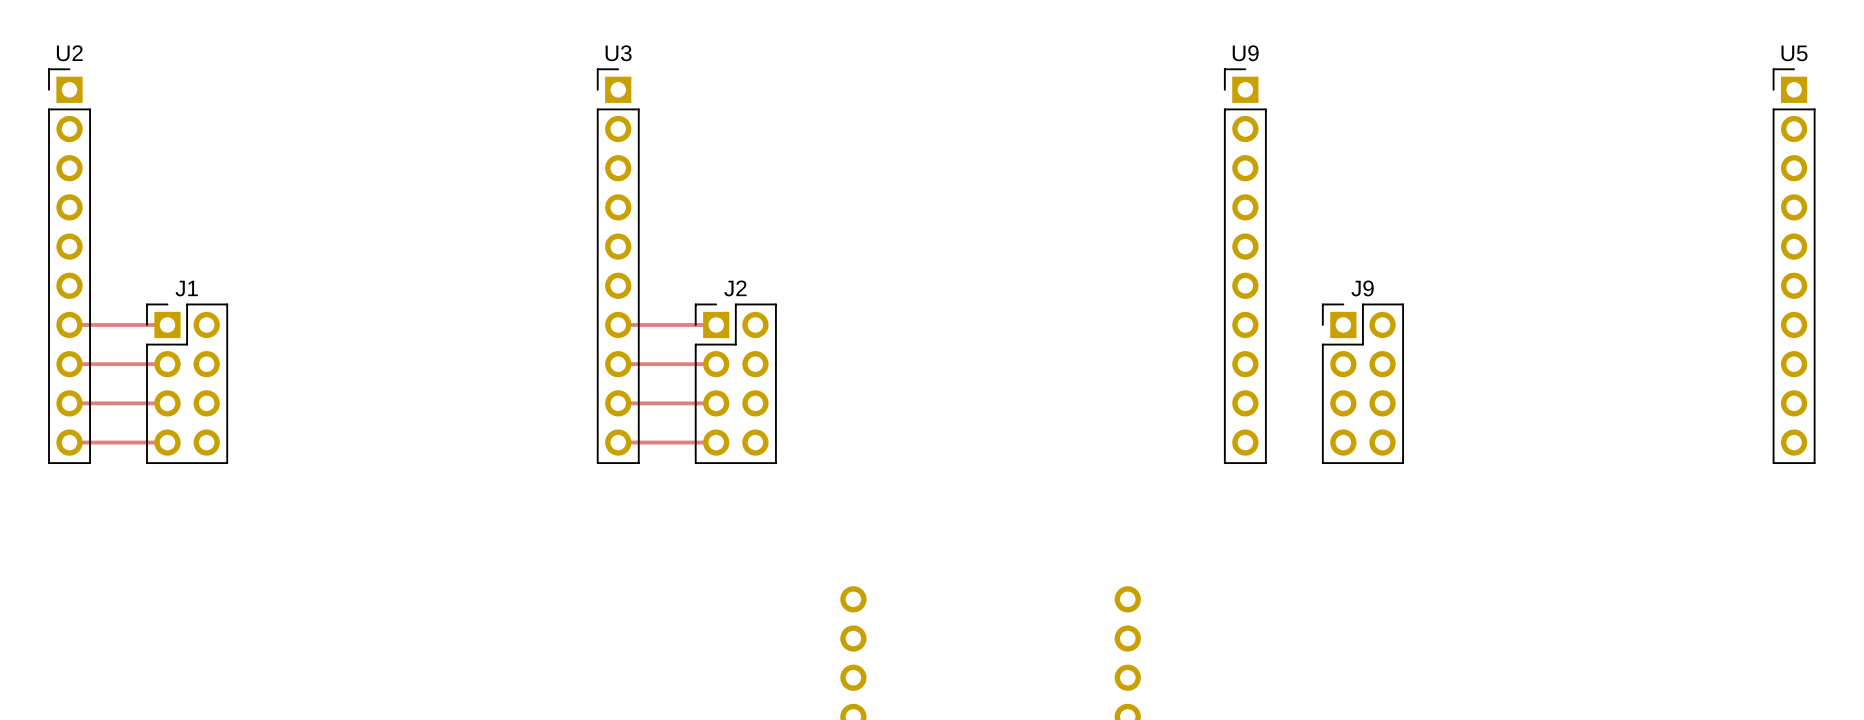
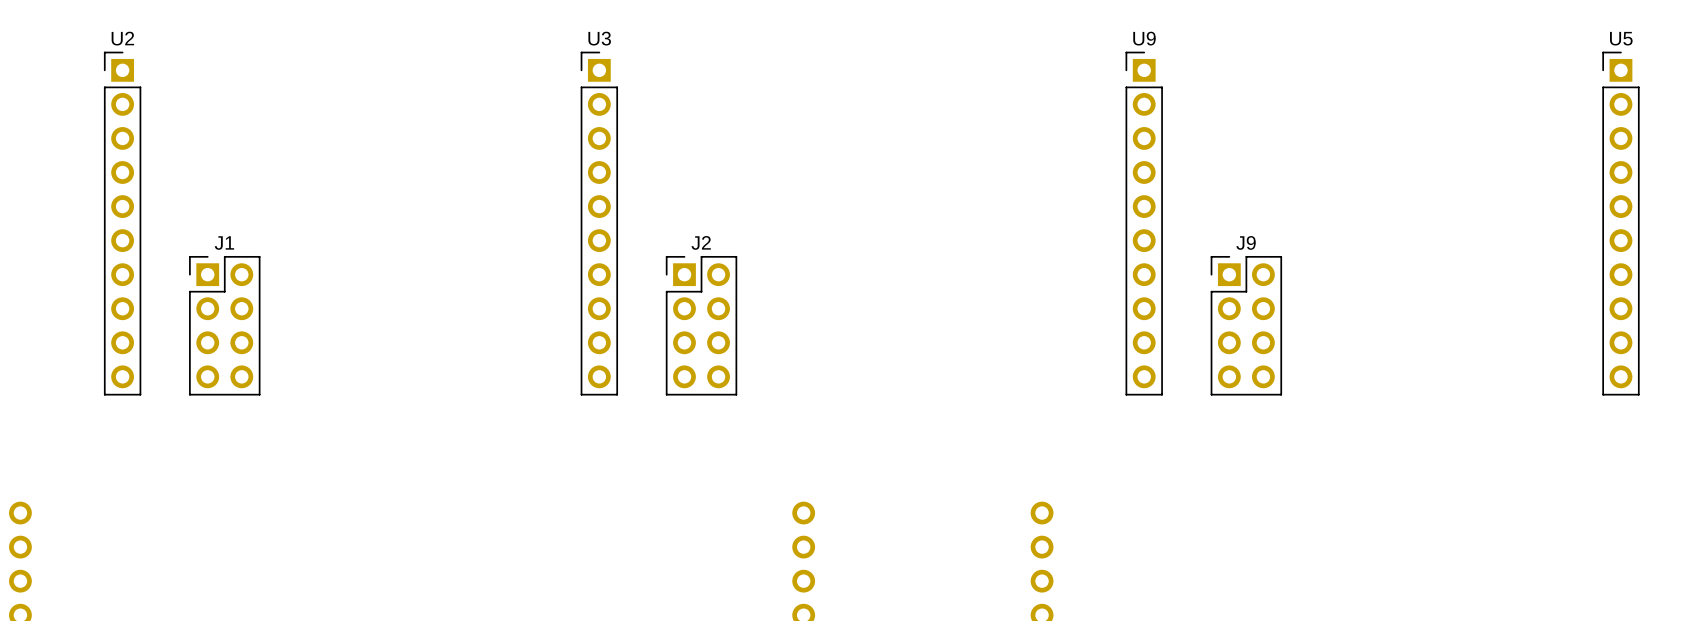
track: (69, 324) (167, 324) -> none
track: (618, 324) (716, 324) -> none
track: (69, 364) (167, 364) -> none
track: (618, 364) (716, 364) -> none
track: (69, 403) (167, 403) -> none
track: (618, 403) (716, 403) -> none
track: (69, 442) (167, 442) -> none
track: (618, 442) (716, 442) -> none

